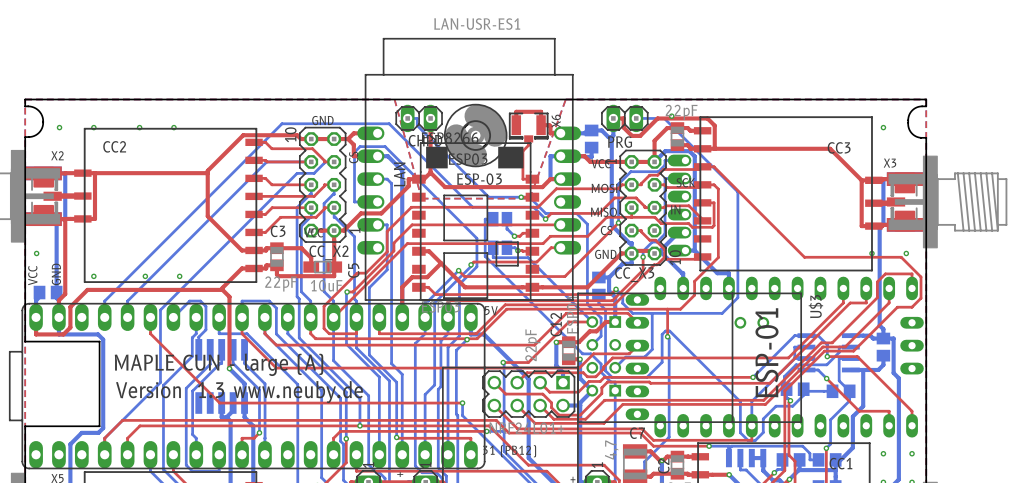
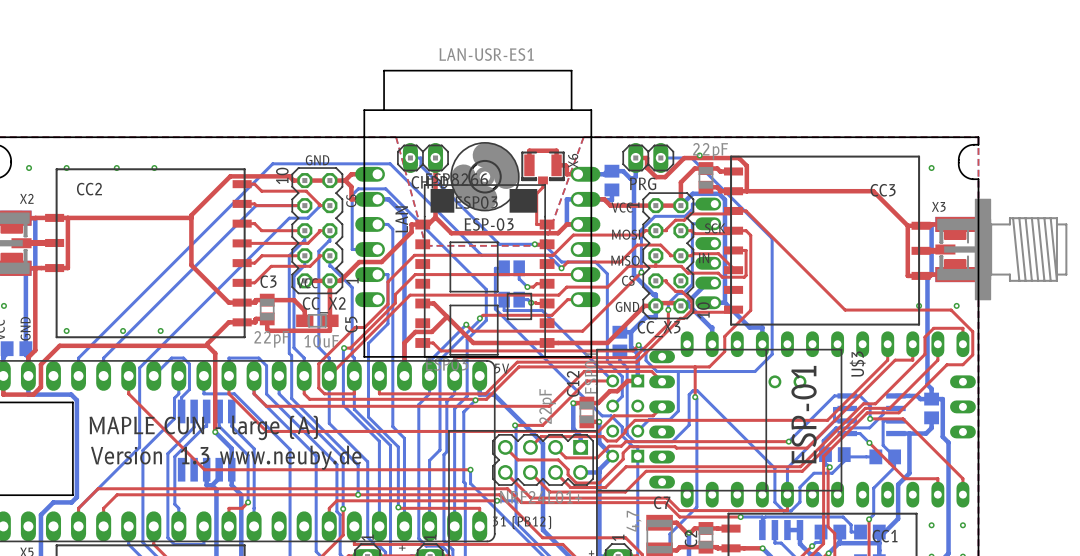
part footprint: [357, 38, 582, 301] -> [355, 70, 601, 358]

